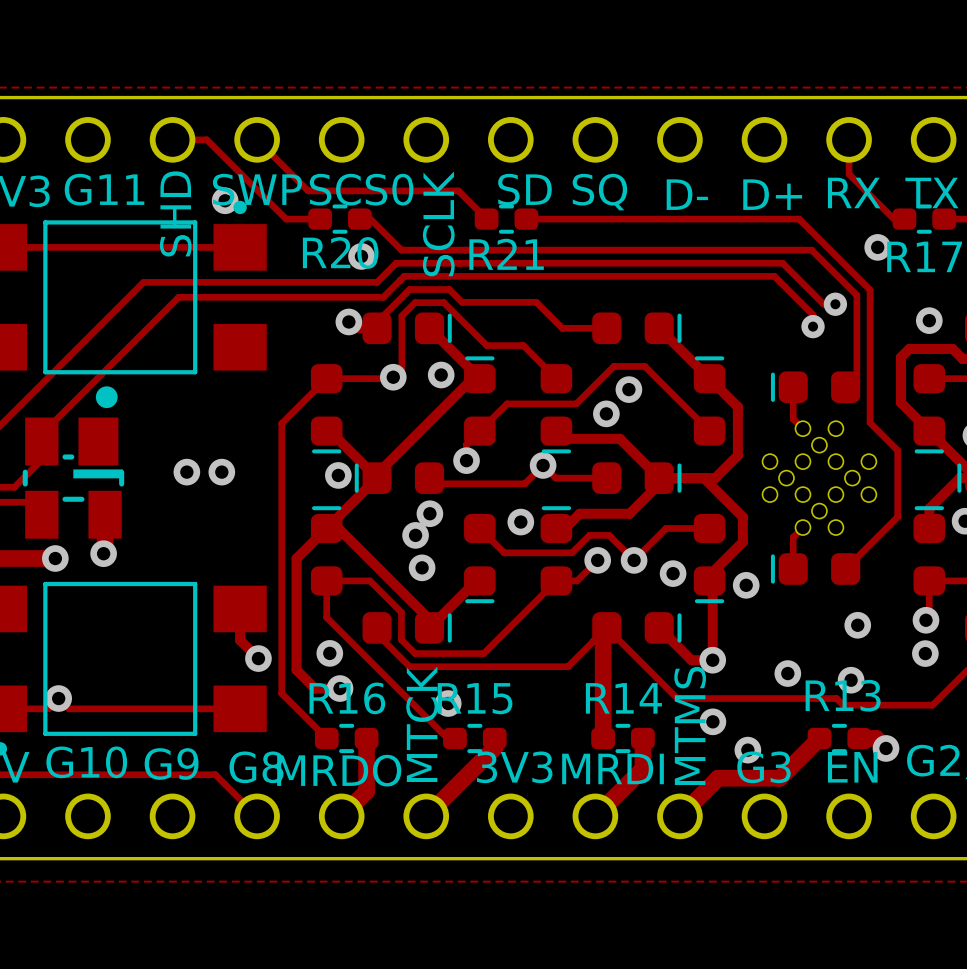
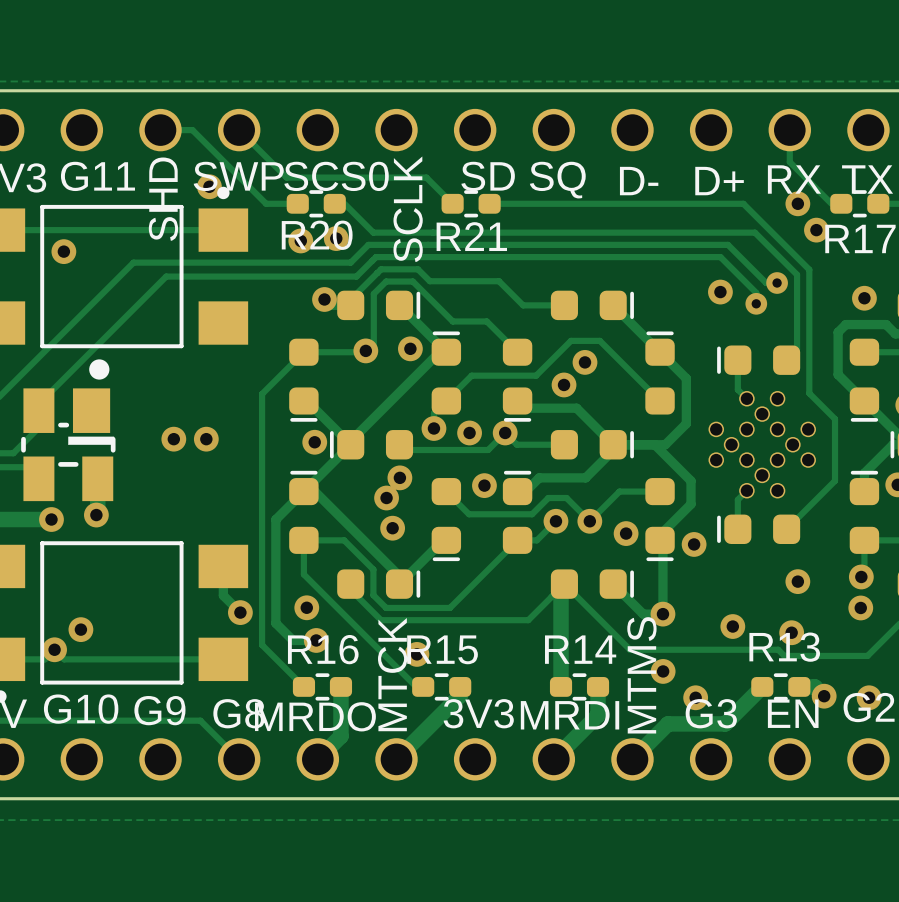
via: none -> (797, 203)
via: none -> (300, 240)
via: none -> (63, 251)
via: none -> (720, 292)
via: none -> (469, 432)
via: none -> (80, 629)
via: none -> (869, 697)

